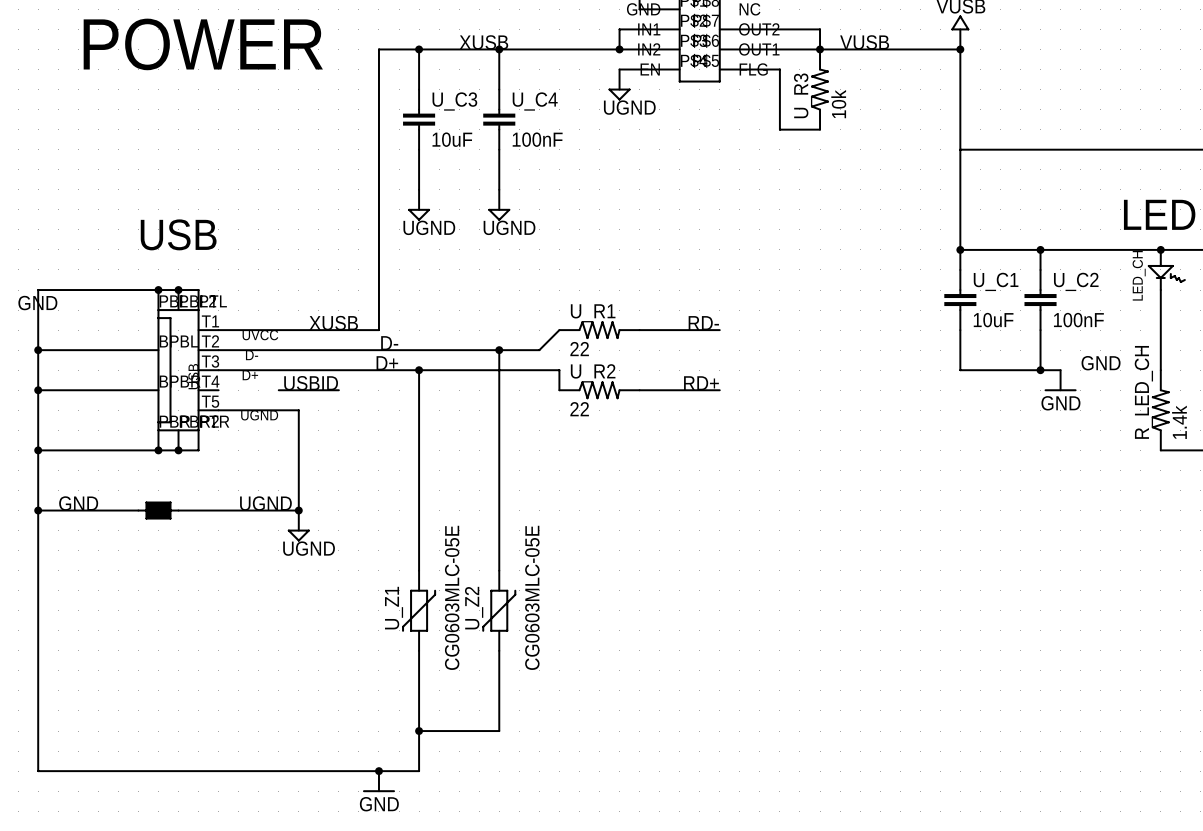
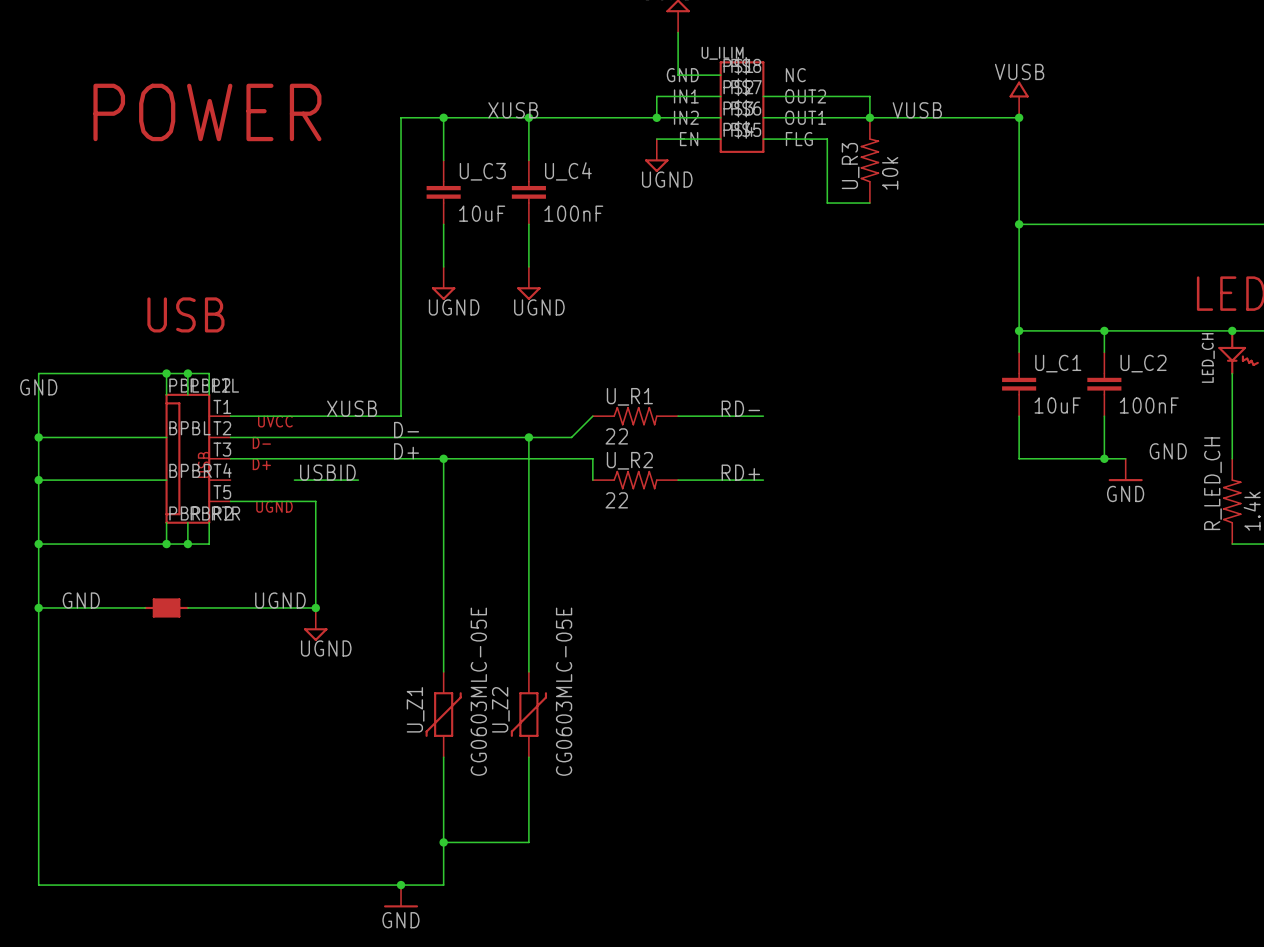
junction: none -> (1019, 224)

